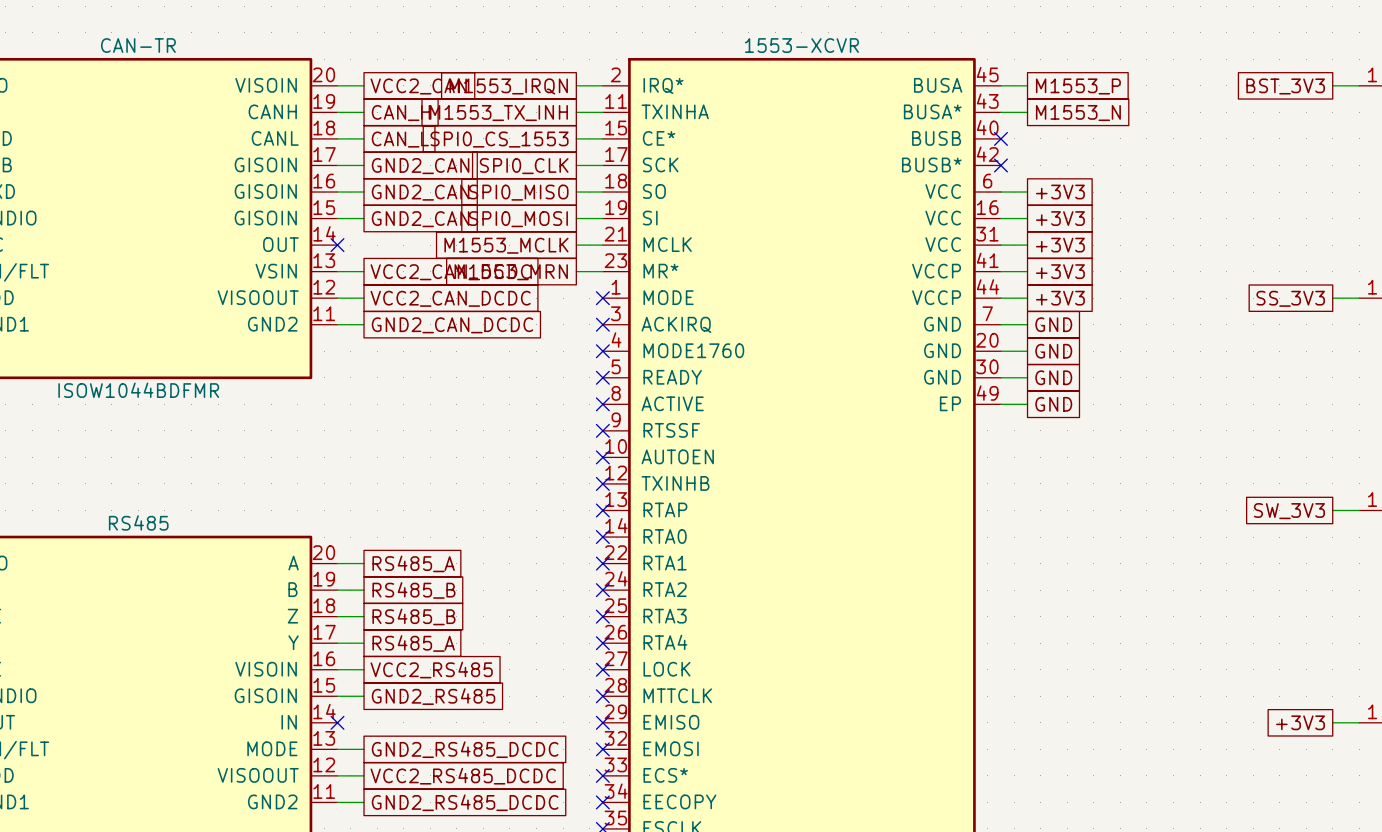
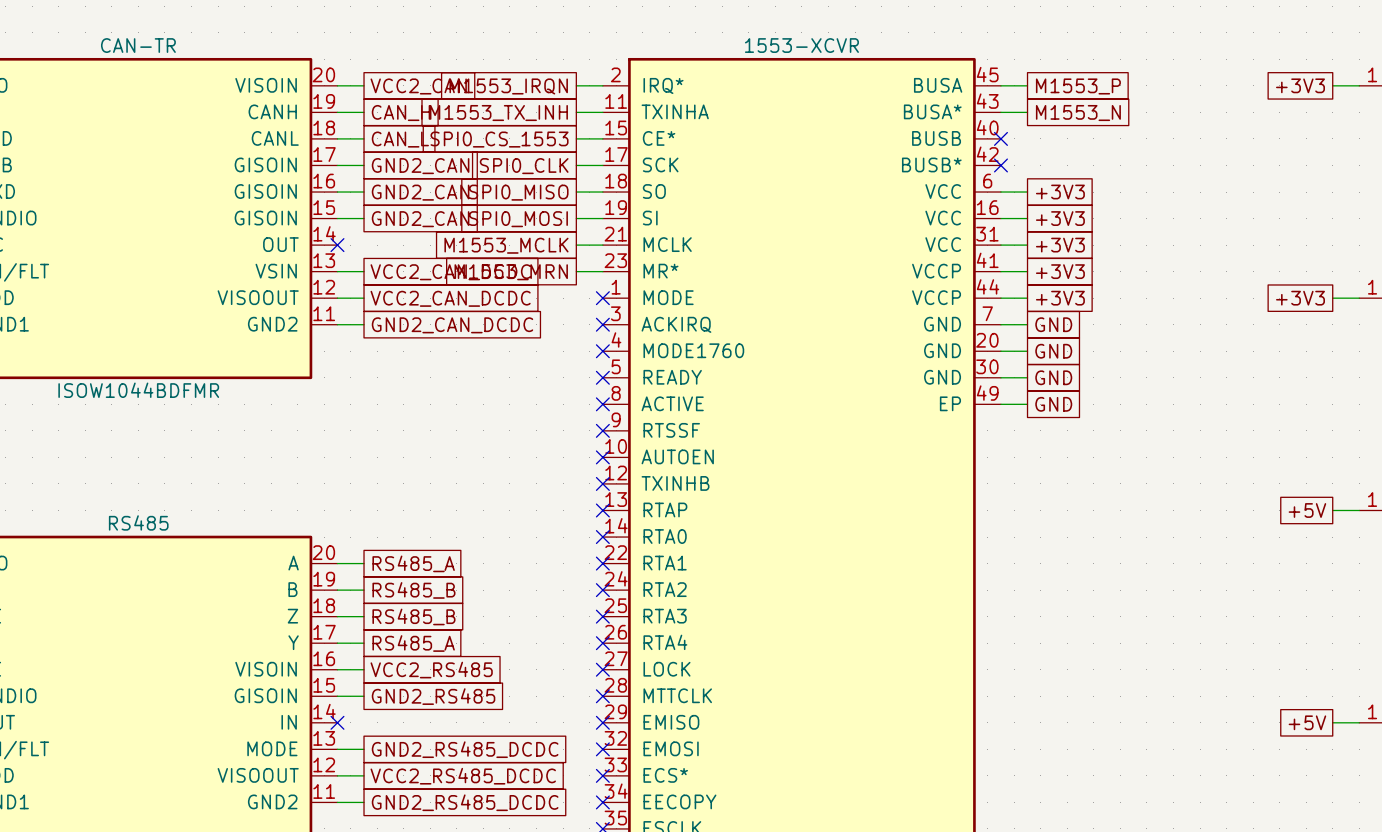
global label: BST_3V3 (1285, 86) -> +3V3 (1300, 85)
global label: SS_3V3 (1290, 298) -> +3V3 (1300, 298)
global label: SW_3V3 (1289, 511) -> +5V (1307, 510)
global label: +3V3 (1300, 722) -> +5V (1307, 722)

